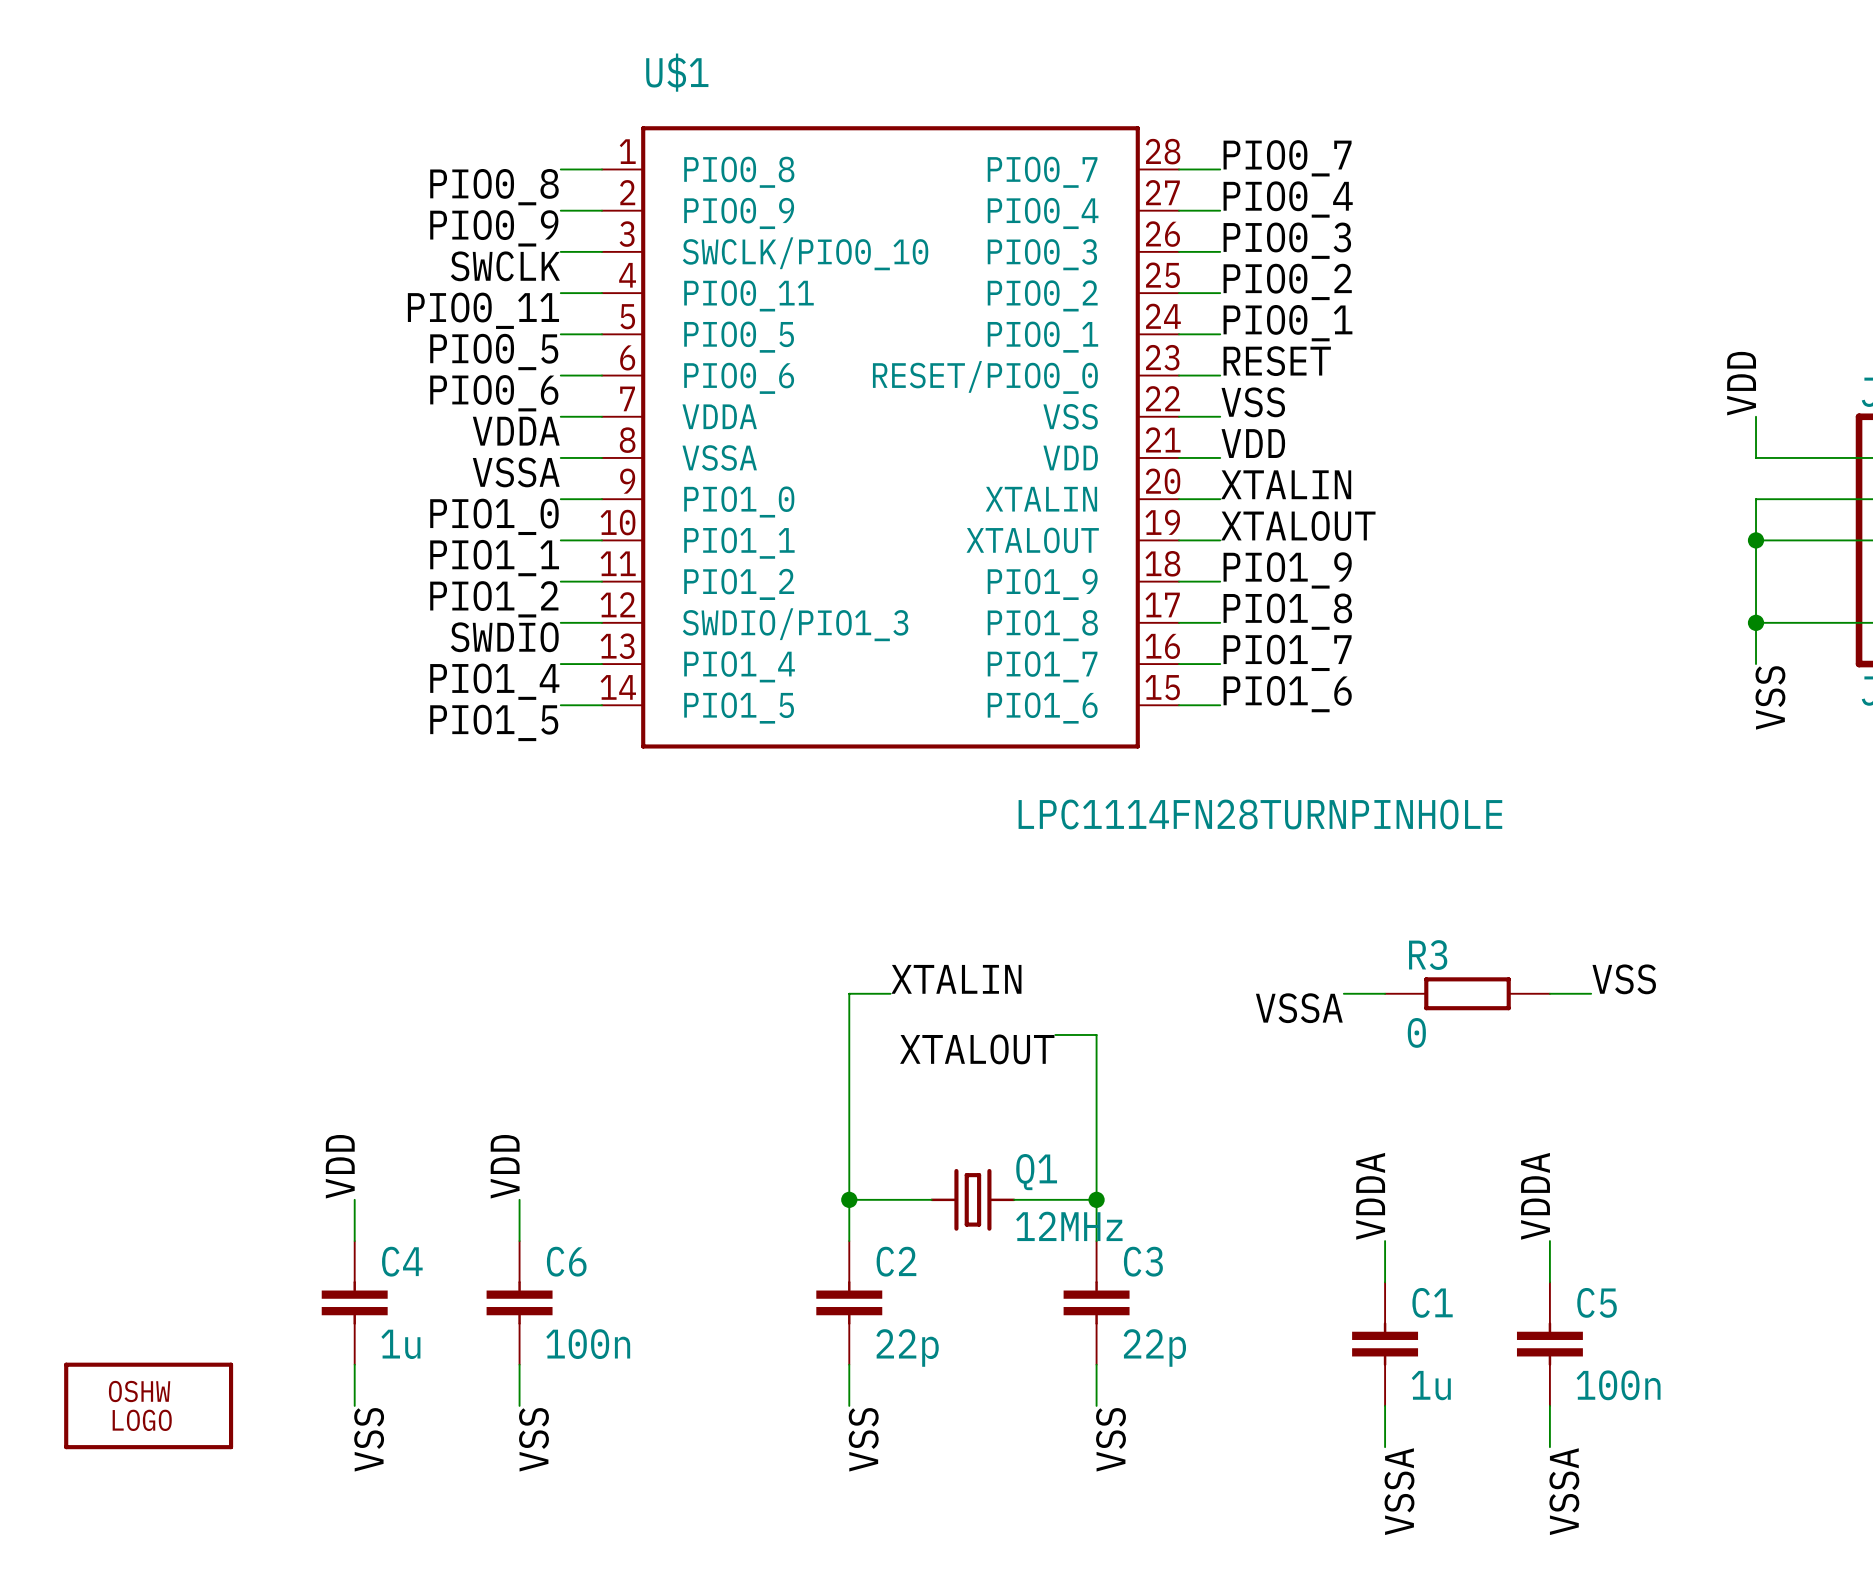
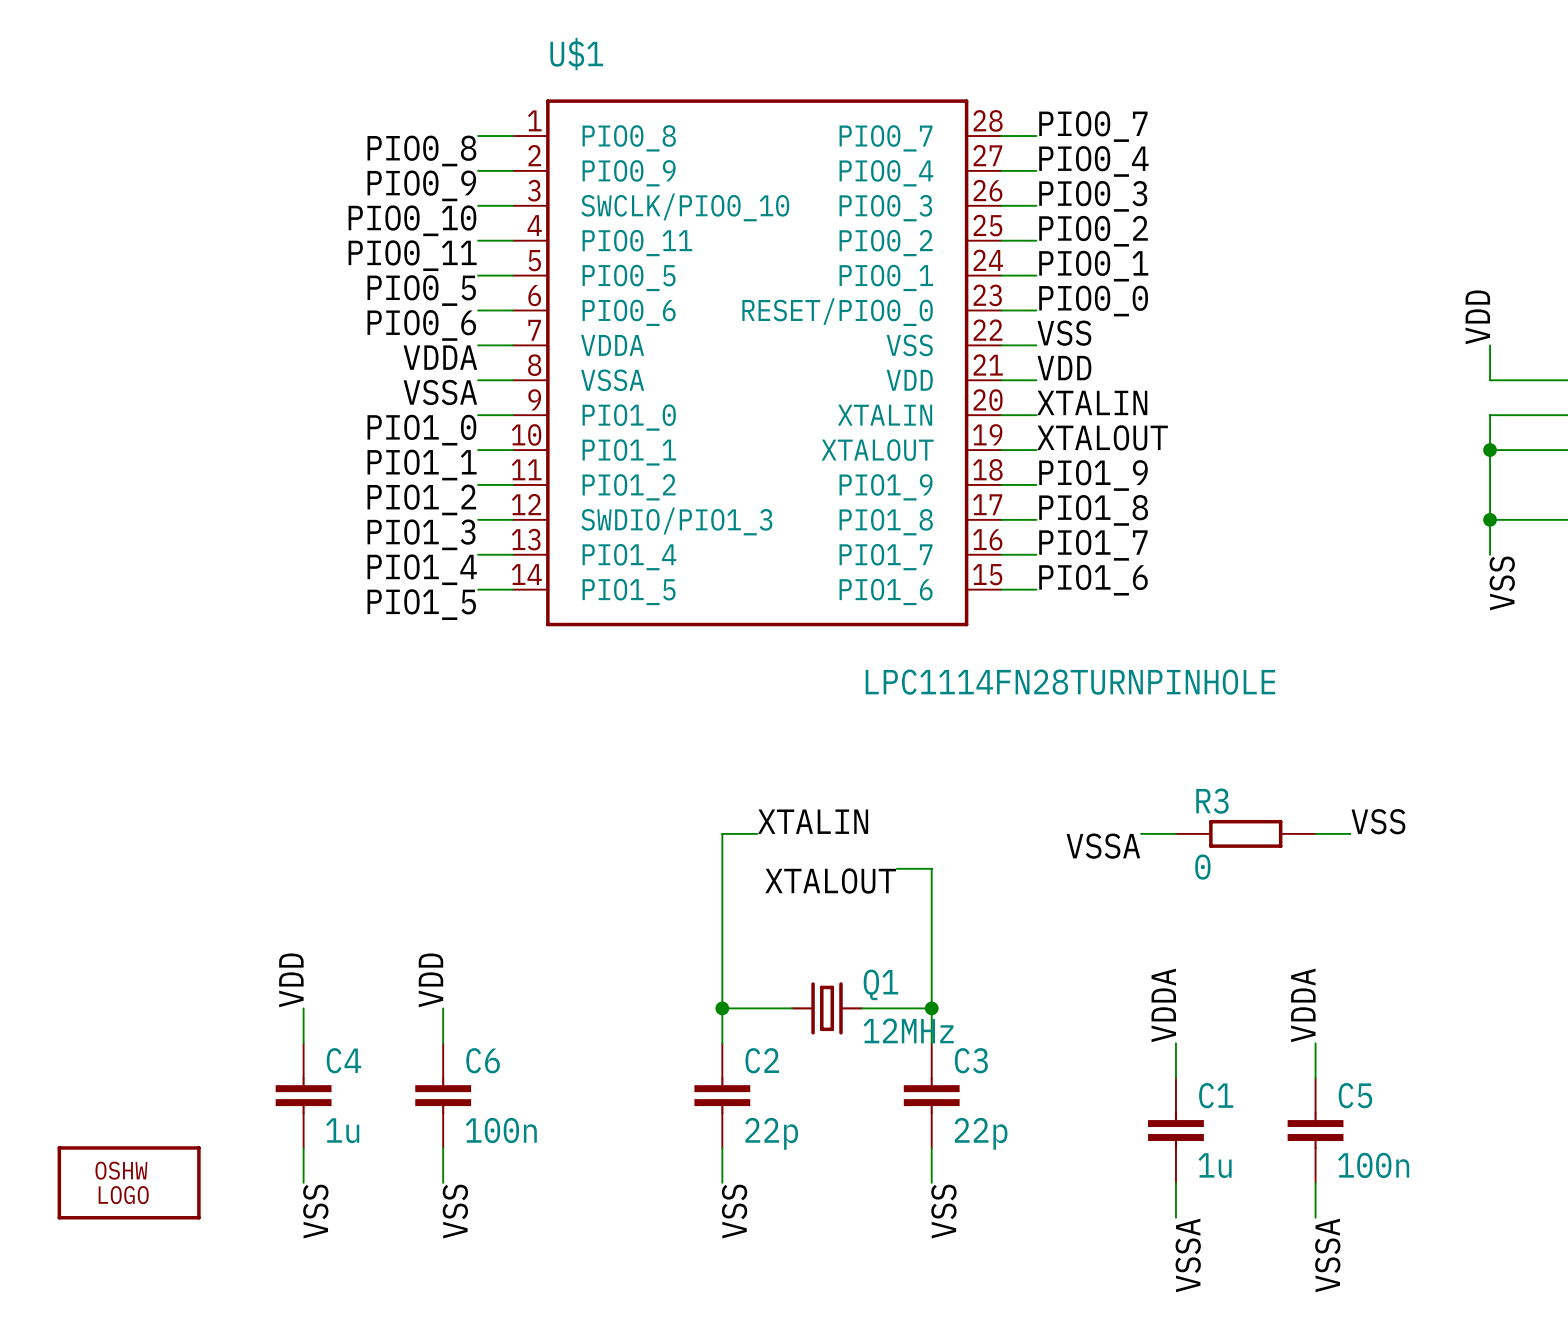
label: SWCLK (505, 266) -> PIO0_10 (412, 220)
label: RESET (1277, 361) -> PIO0_0 (1093, 301)
label: SWDIO (504, 637) -> PIO1_3 (421, 534)

